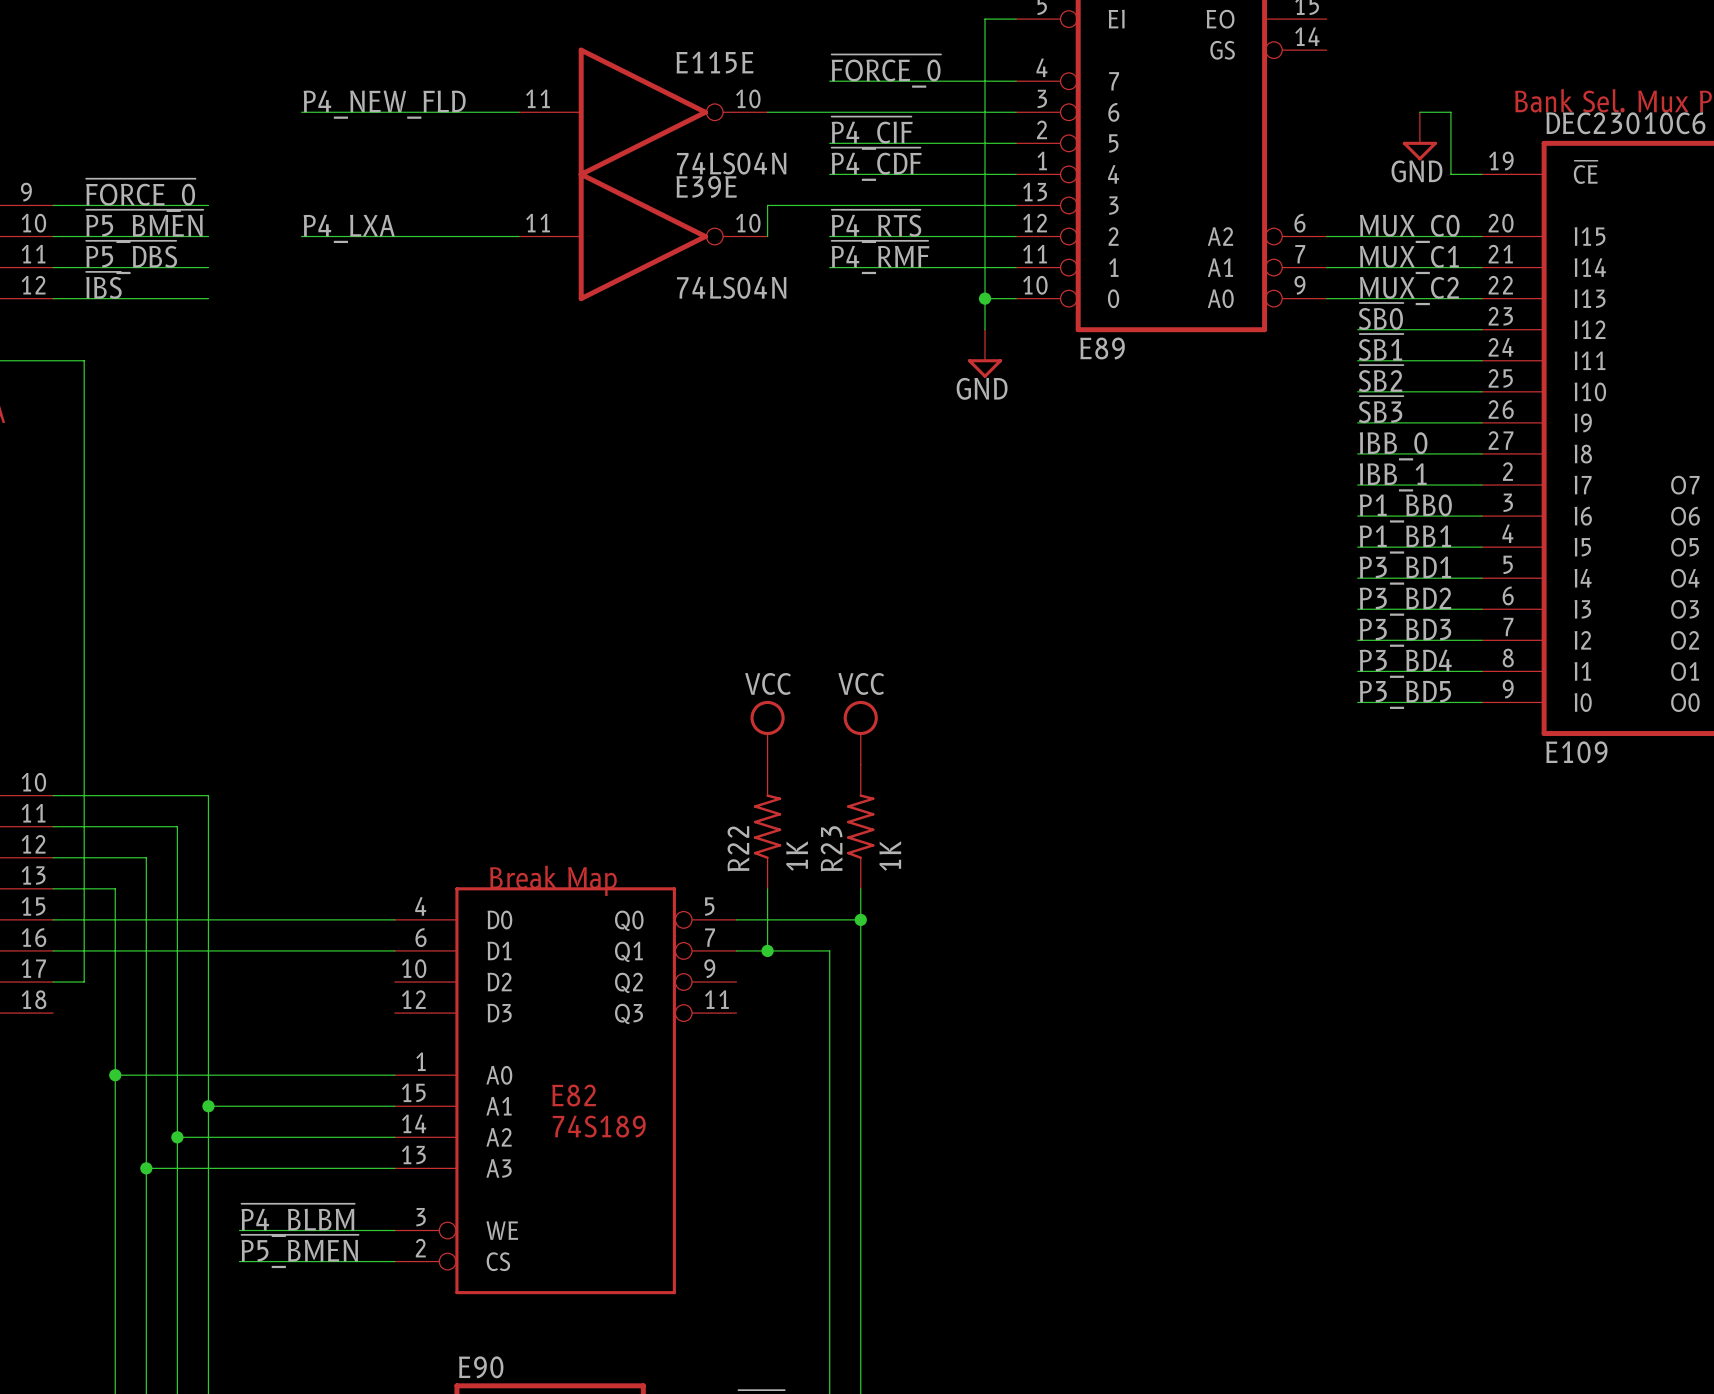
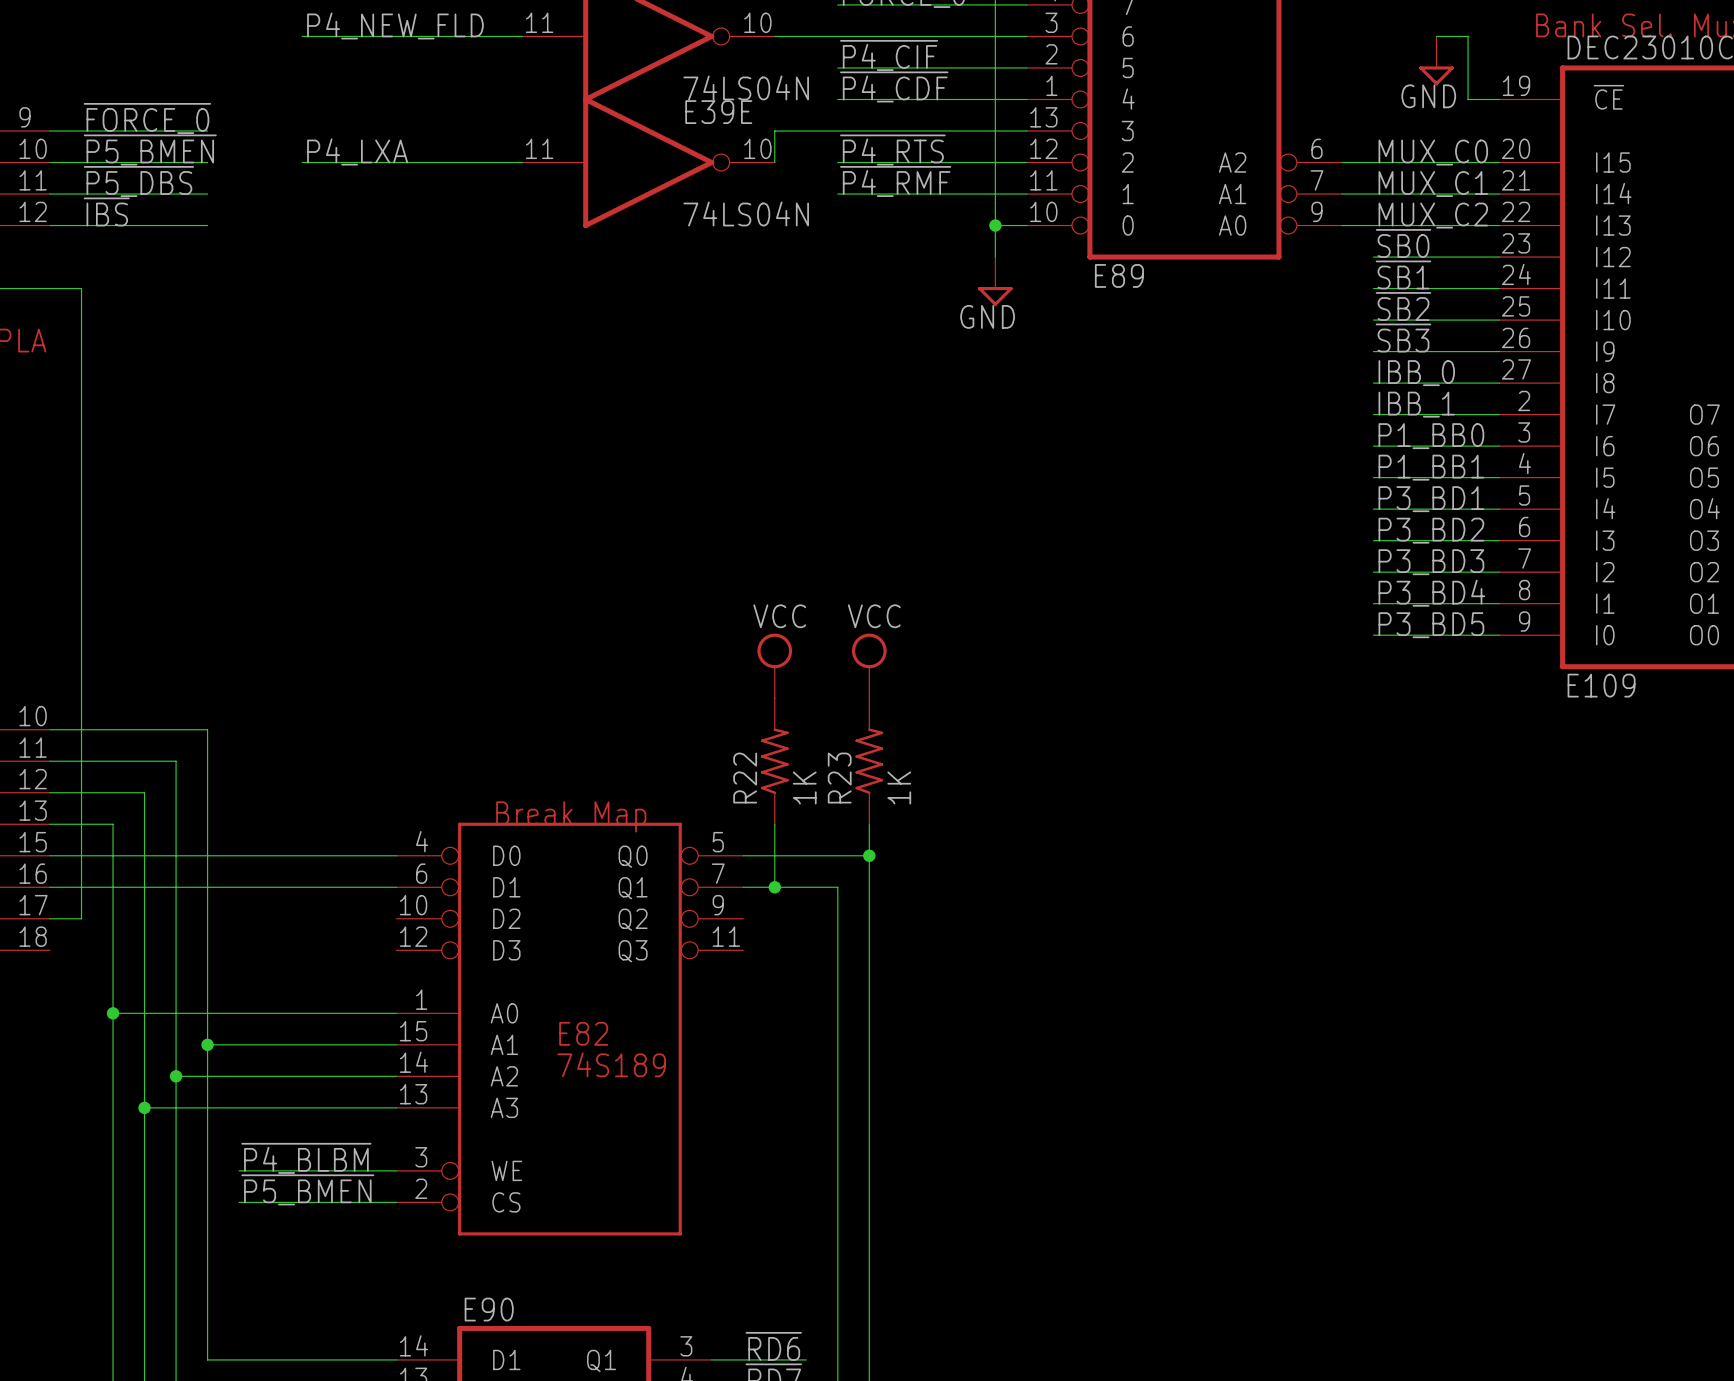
E82 symbol: [394, 887, 737, 1295] -> [396, 822, 744, 1236]

